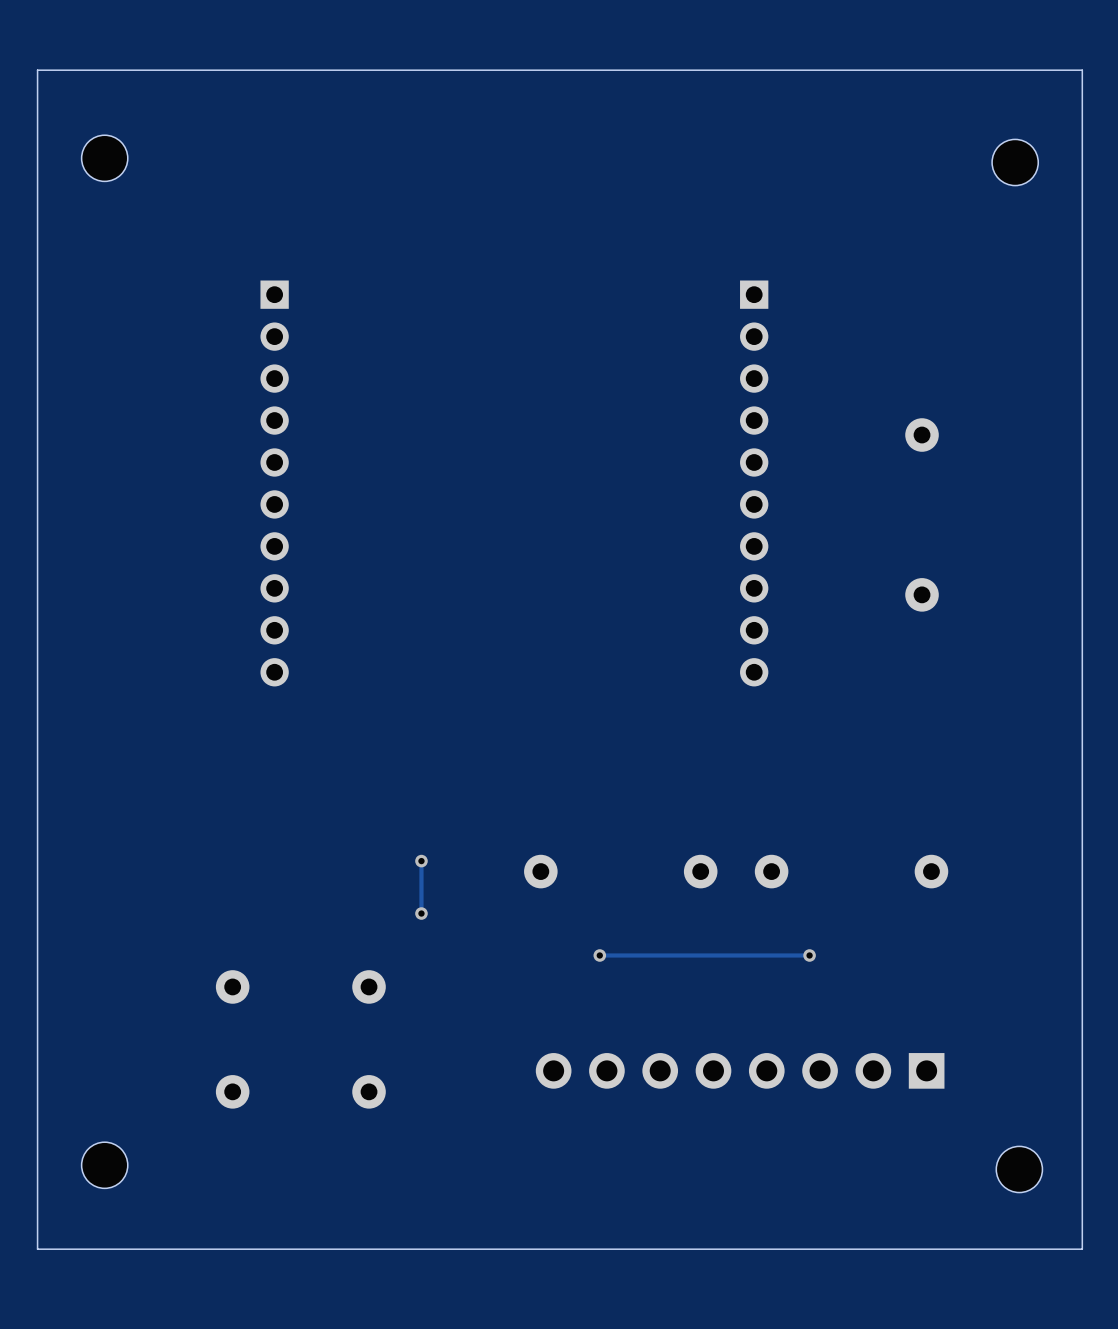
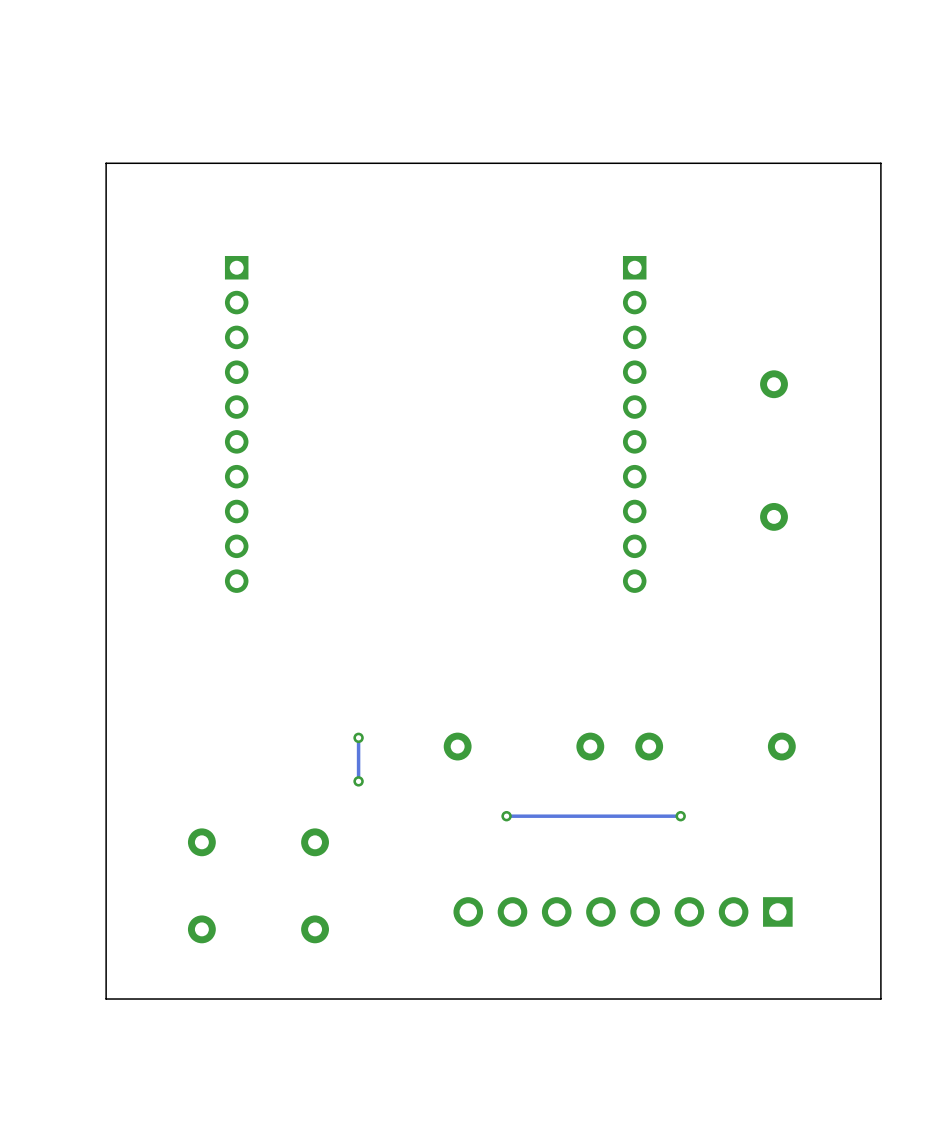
board edge: (1082, 70) (37, 70) (37, 1249) (1082, 1249) (1082, 70) -> (880, 163) (880, 999) (106, 999) (106, 163) (880, 163)
part: (104, 158) -> none
part: (1015, 162) -> none
part: (104, 1165) -> none
part: (1019, 1169) -> none

